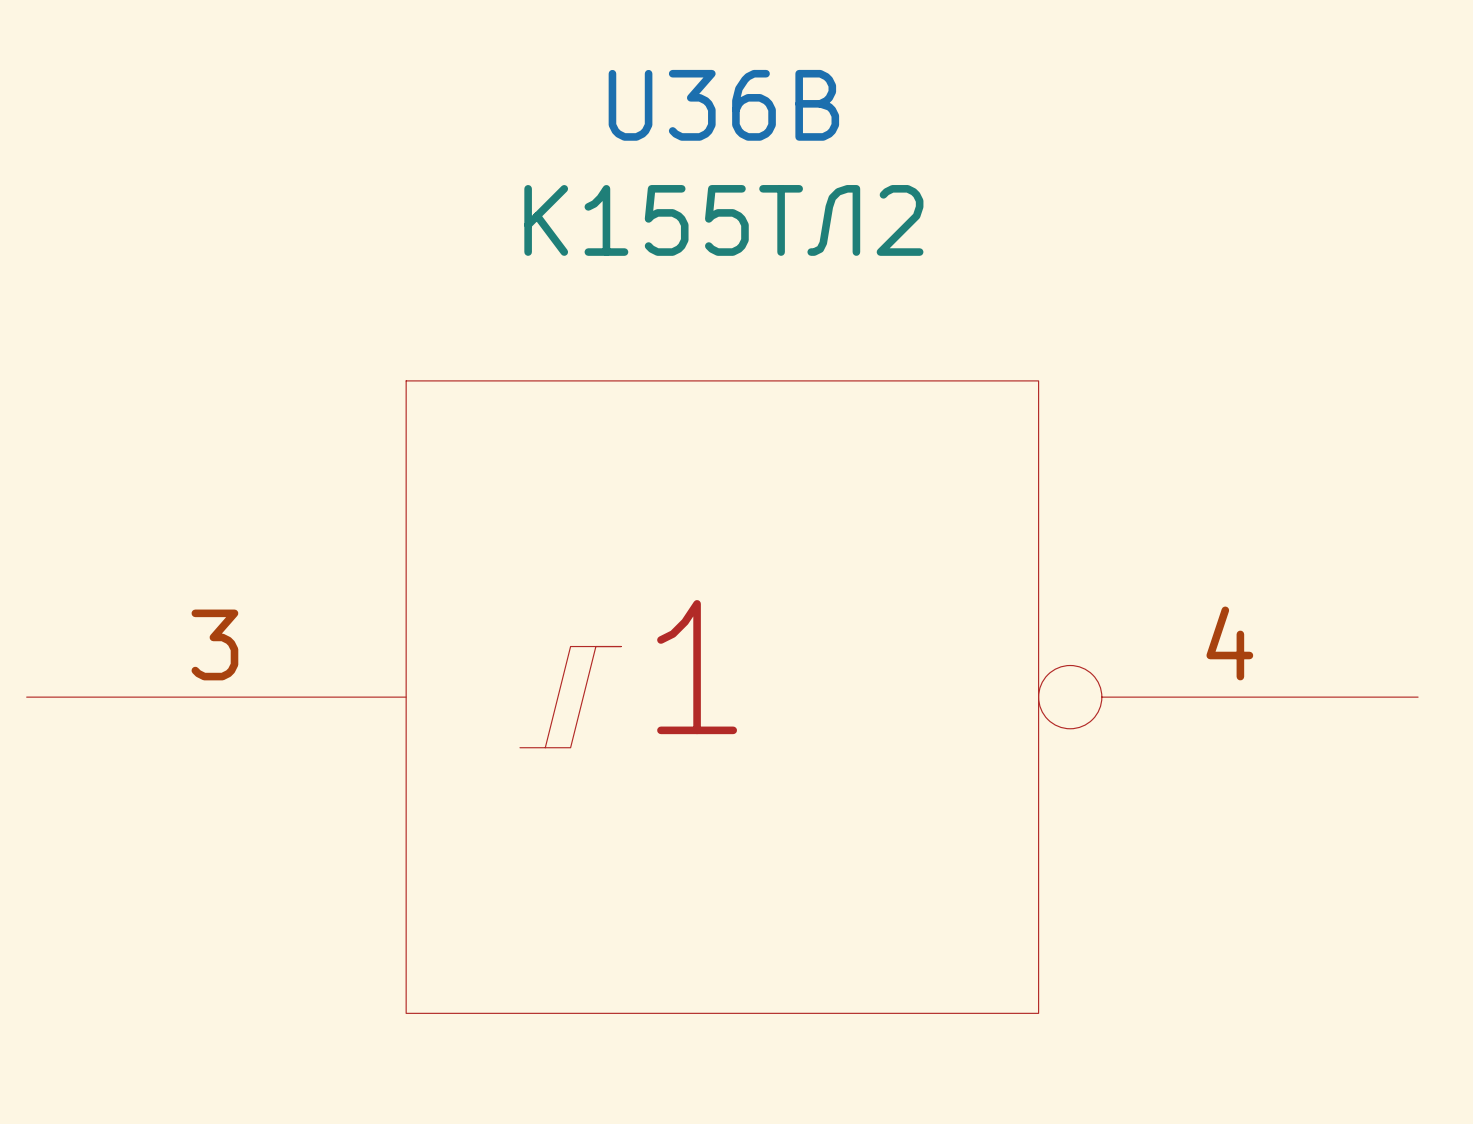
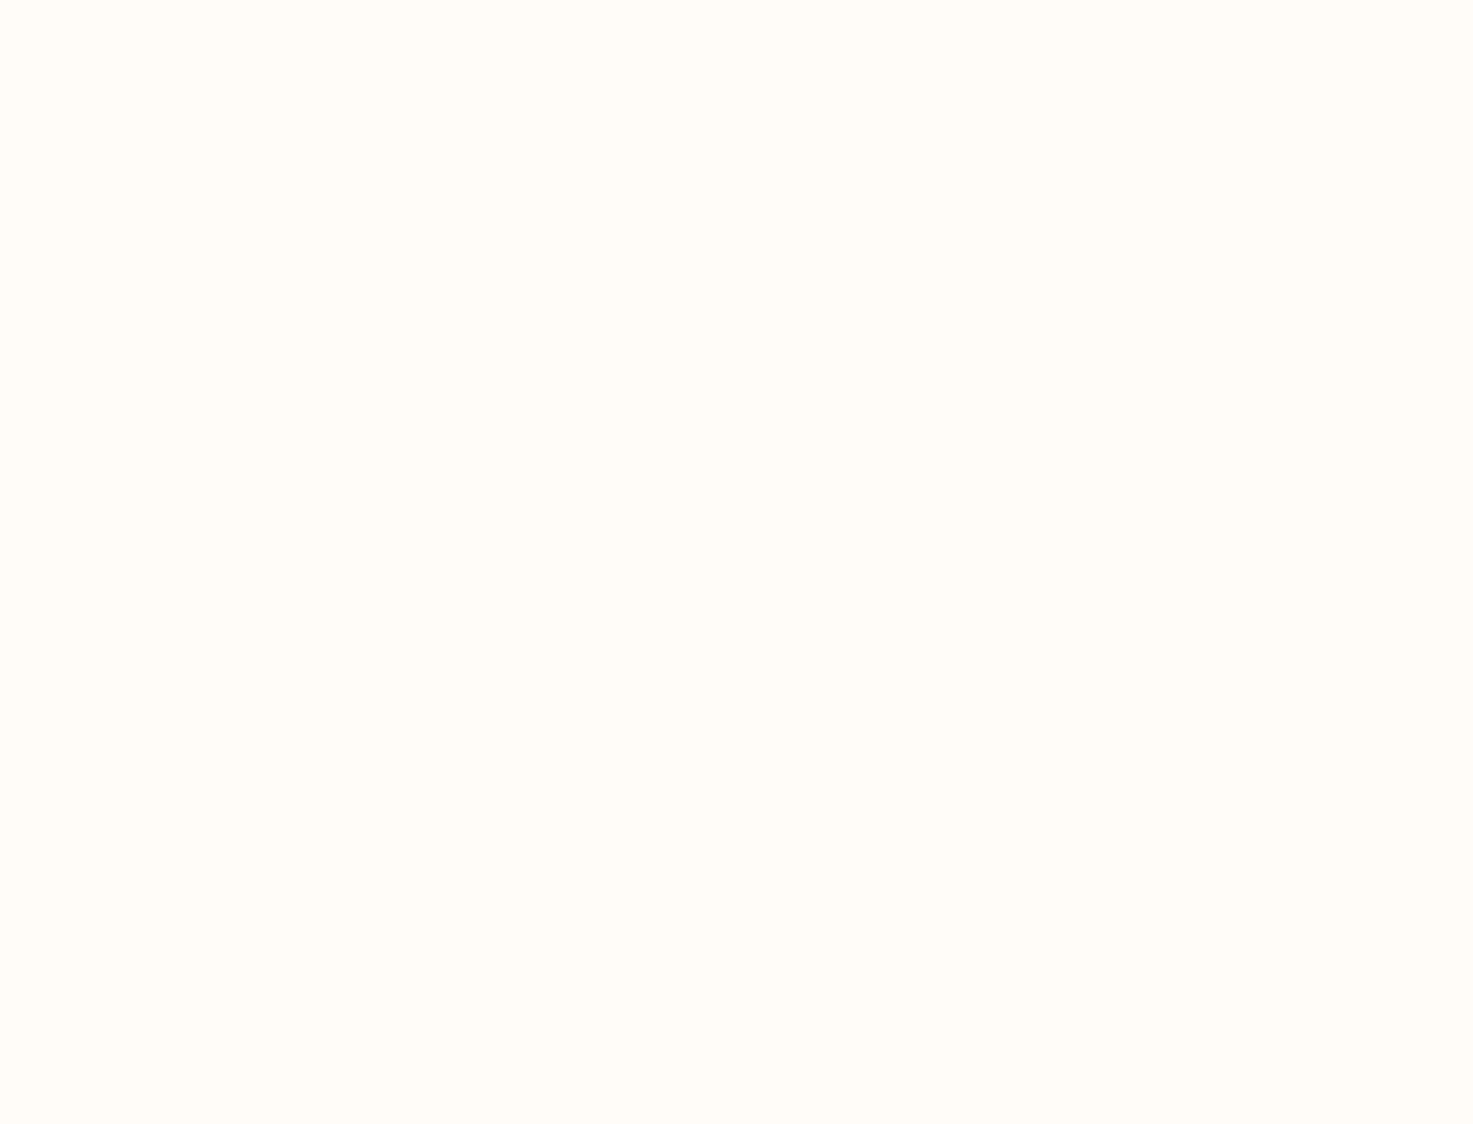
U36B: К155ТЛ2 (722, 697) -> none

